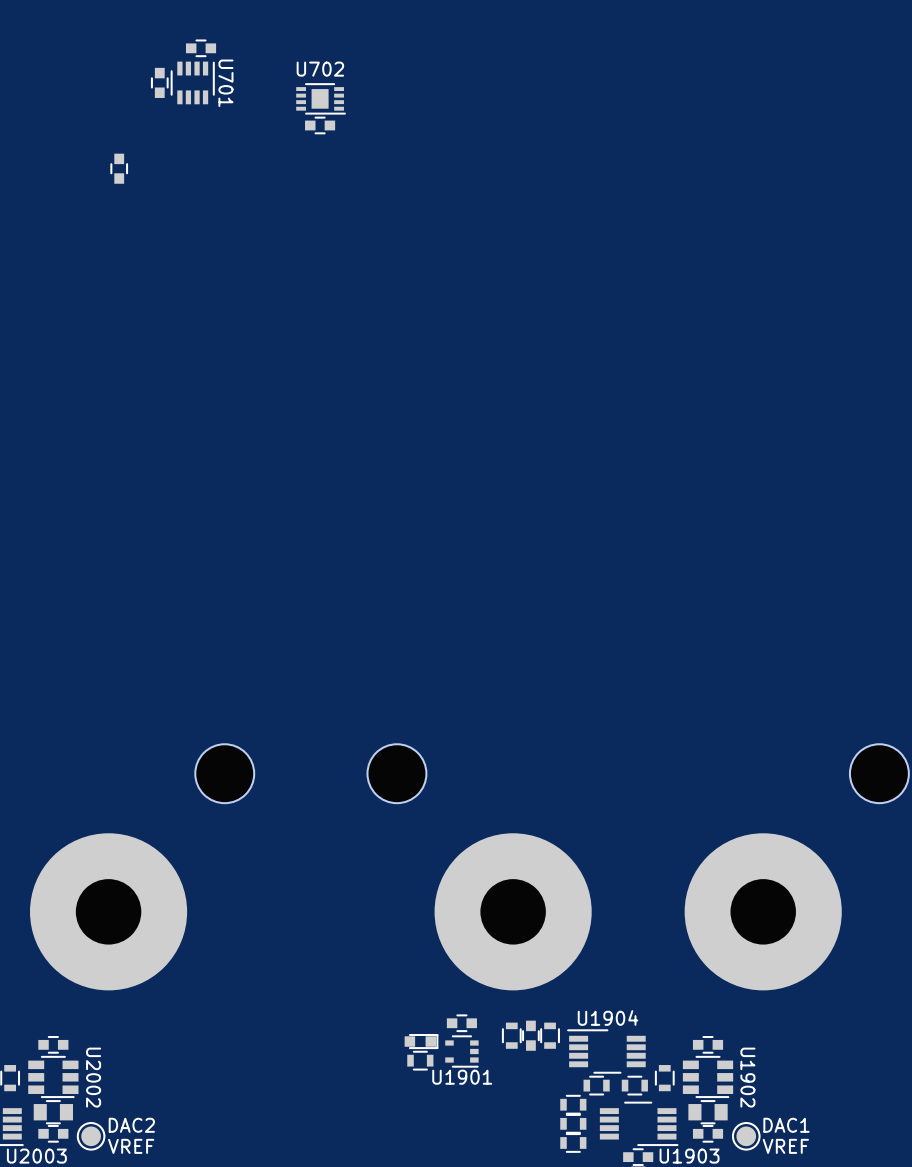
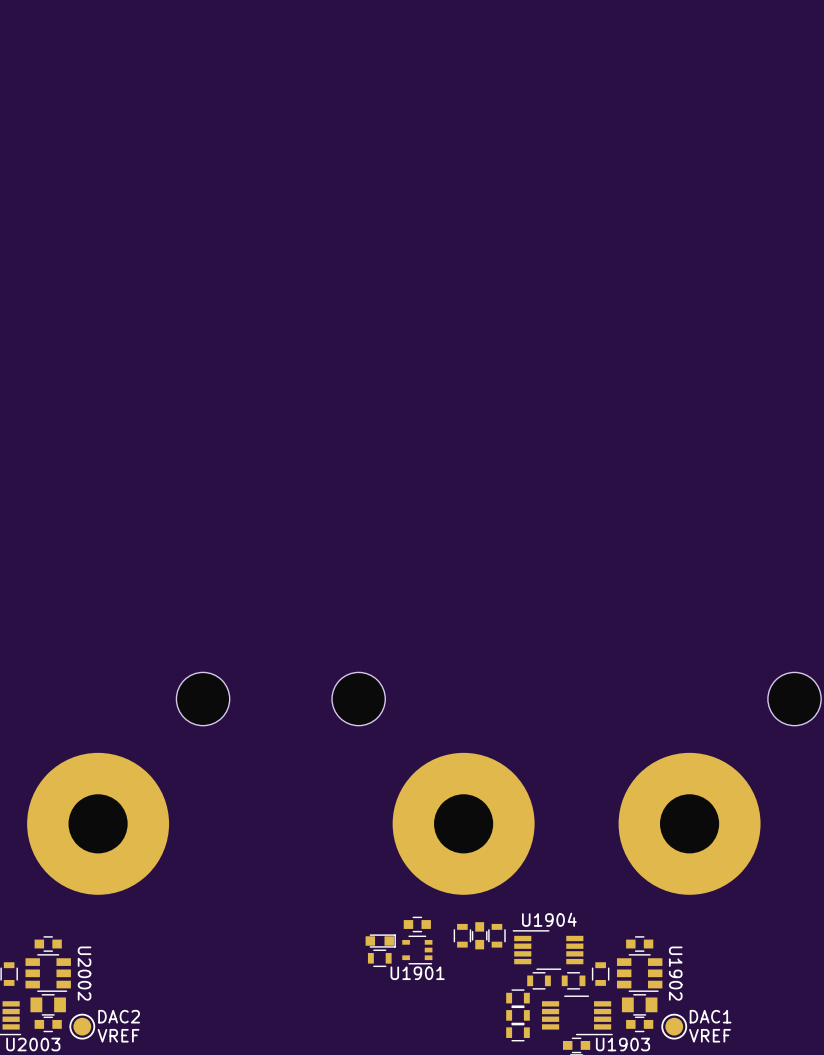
part: (201, 48) -> none
part: (159, 82) -> none
U701: (192, 82) -> none
U702: (321, 98) -> none
part: (320, 125) -> none
part: (119, 168) -> none

